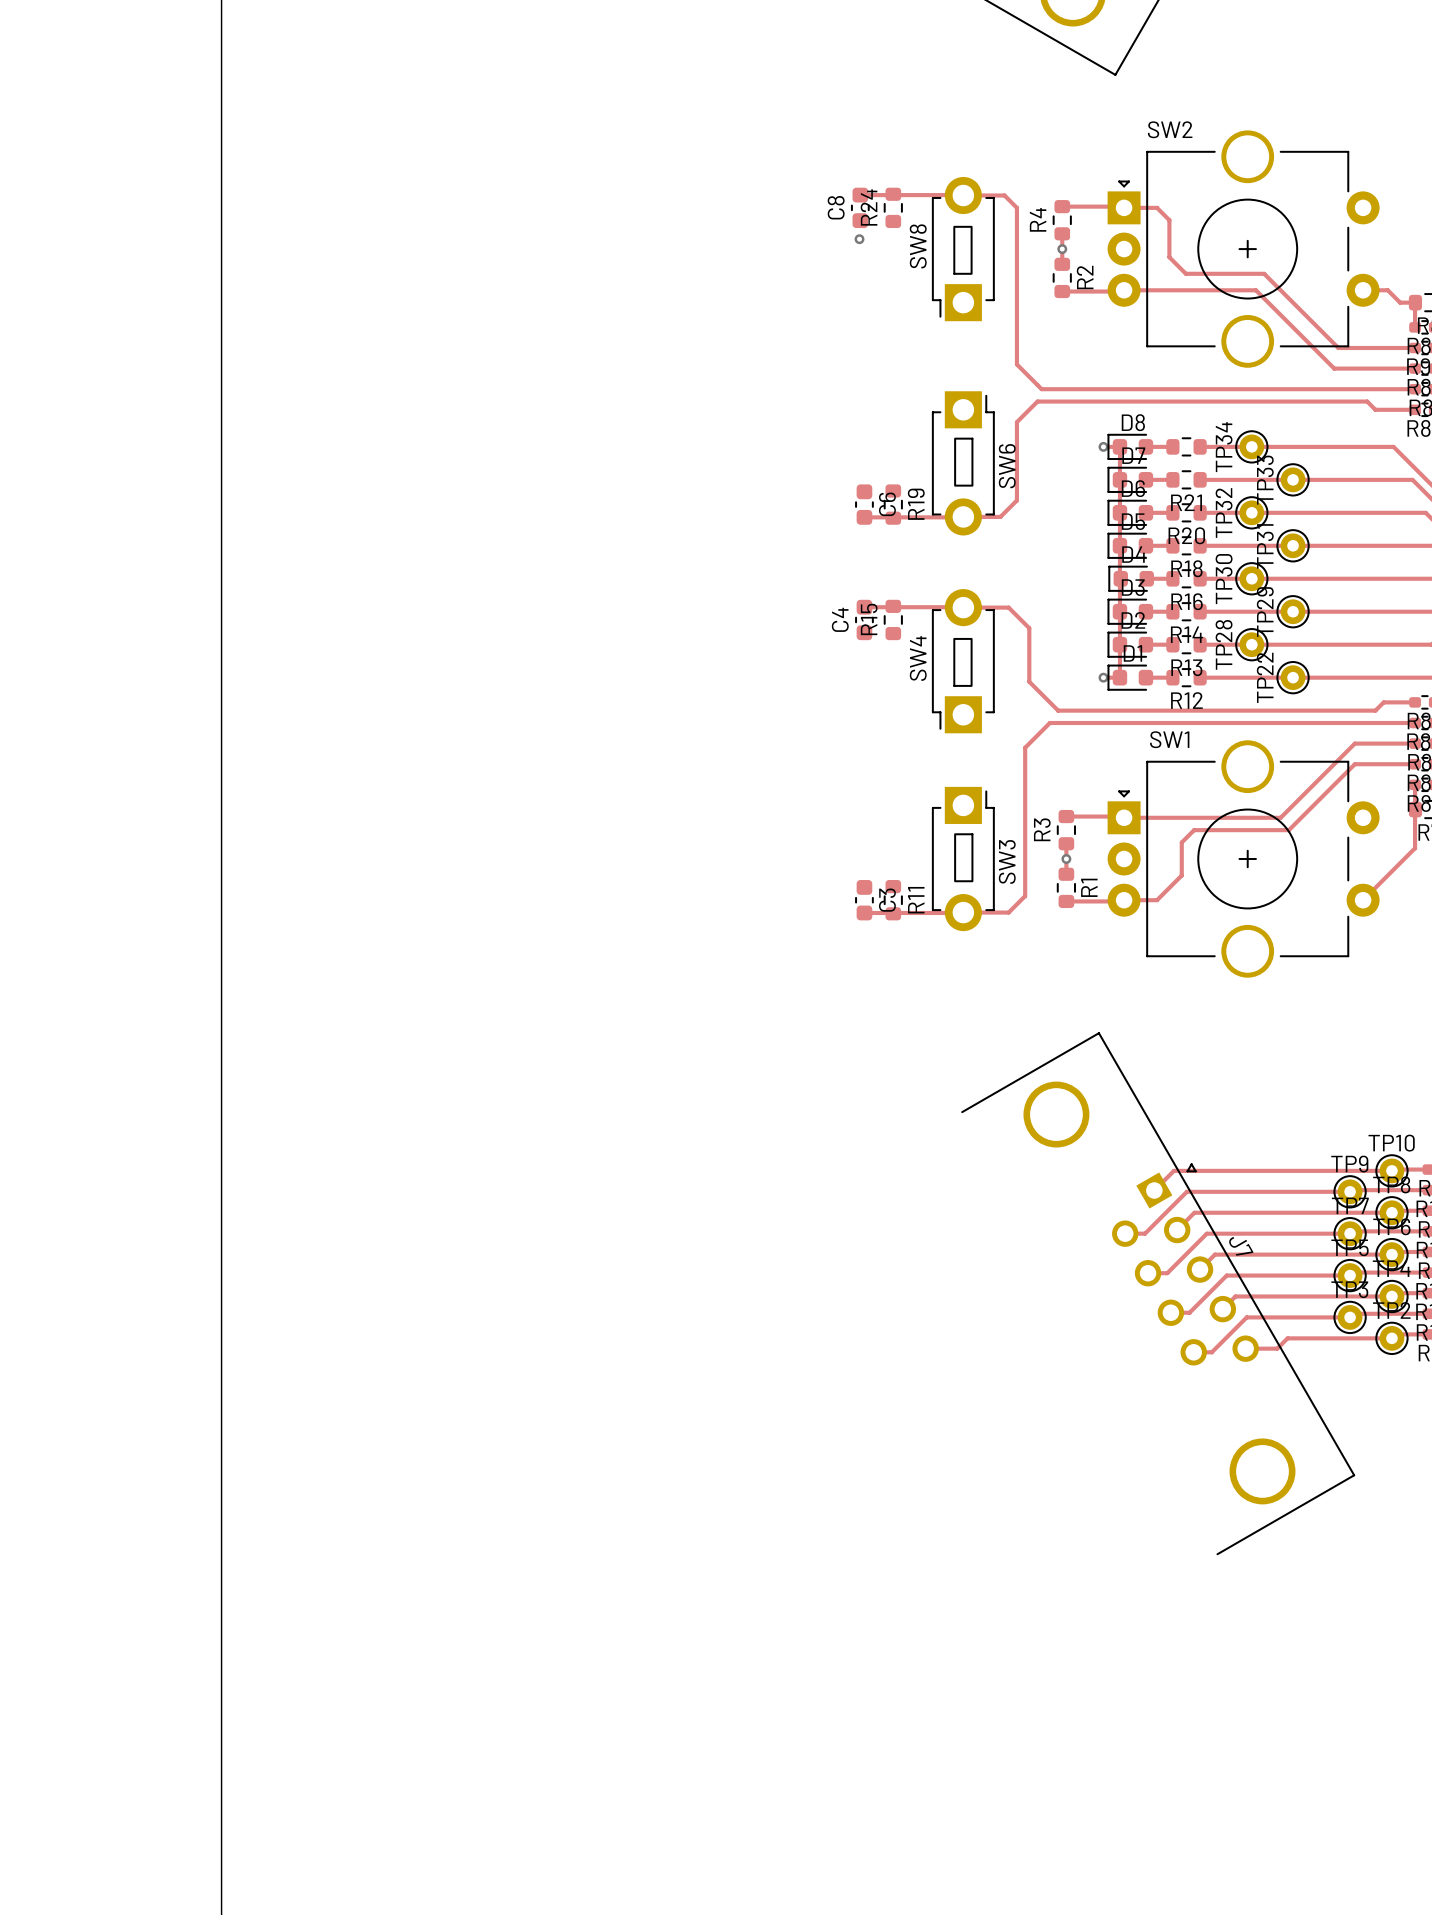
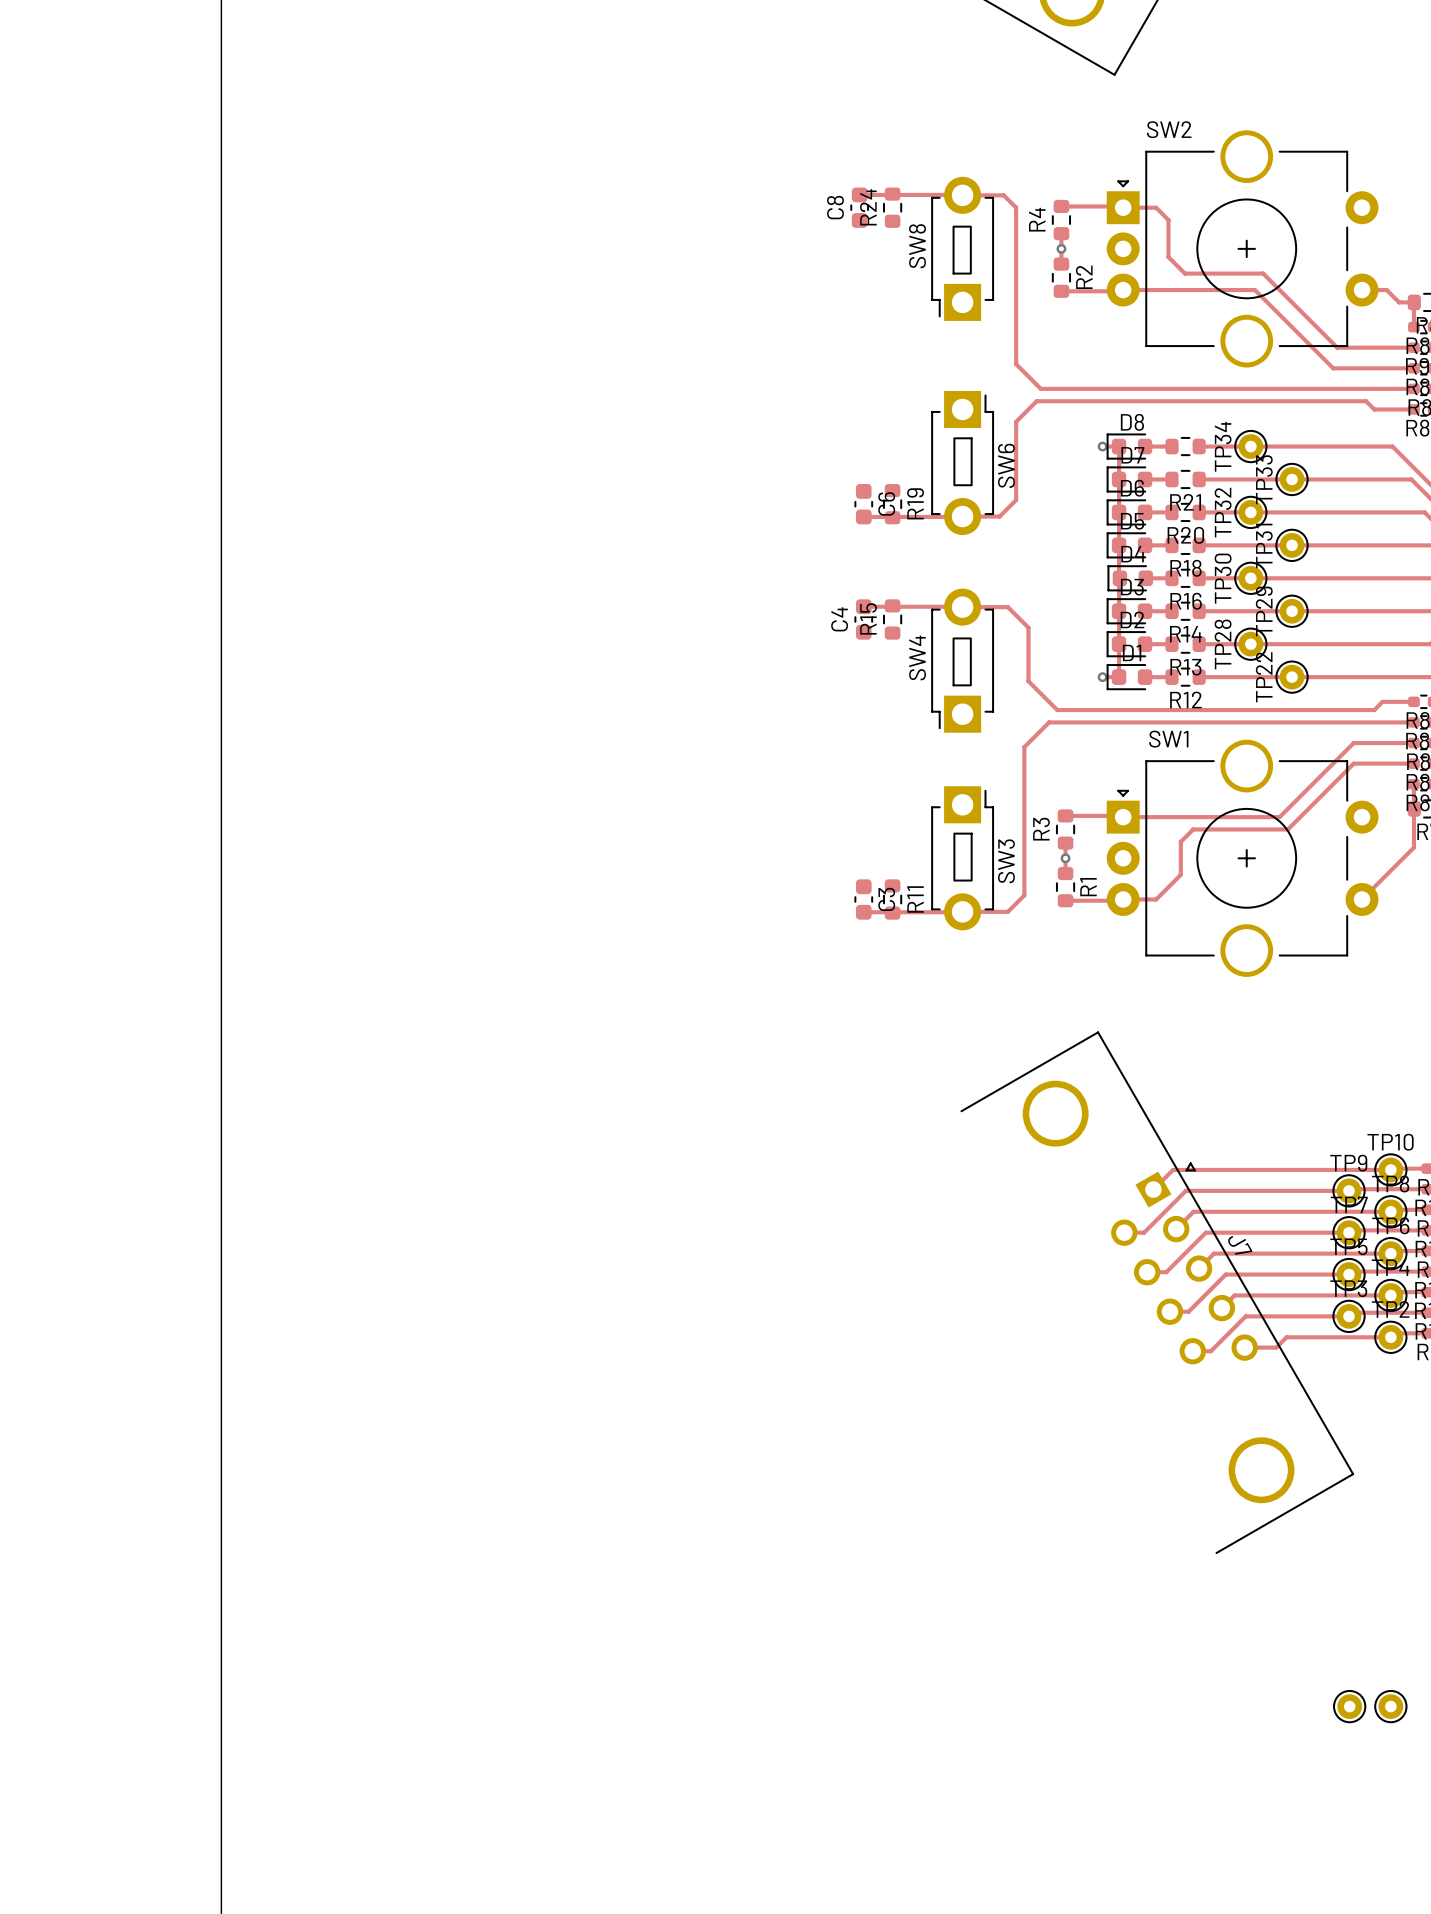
via: (859, 239) -> none
part: none -> (1349, 1706)
part: none -> (1390, 1706)

